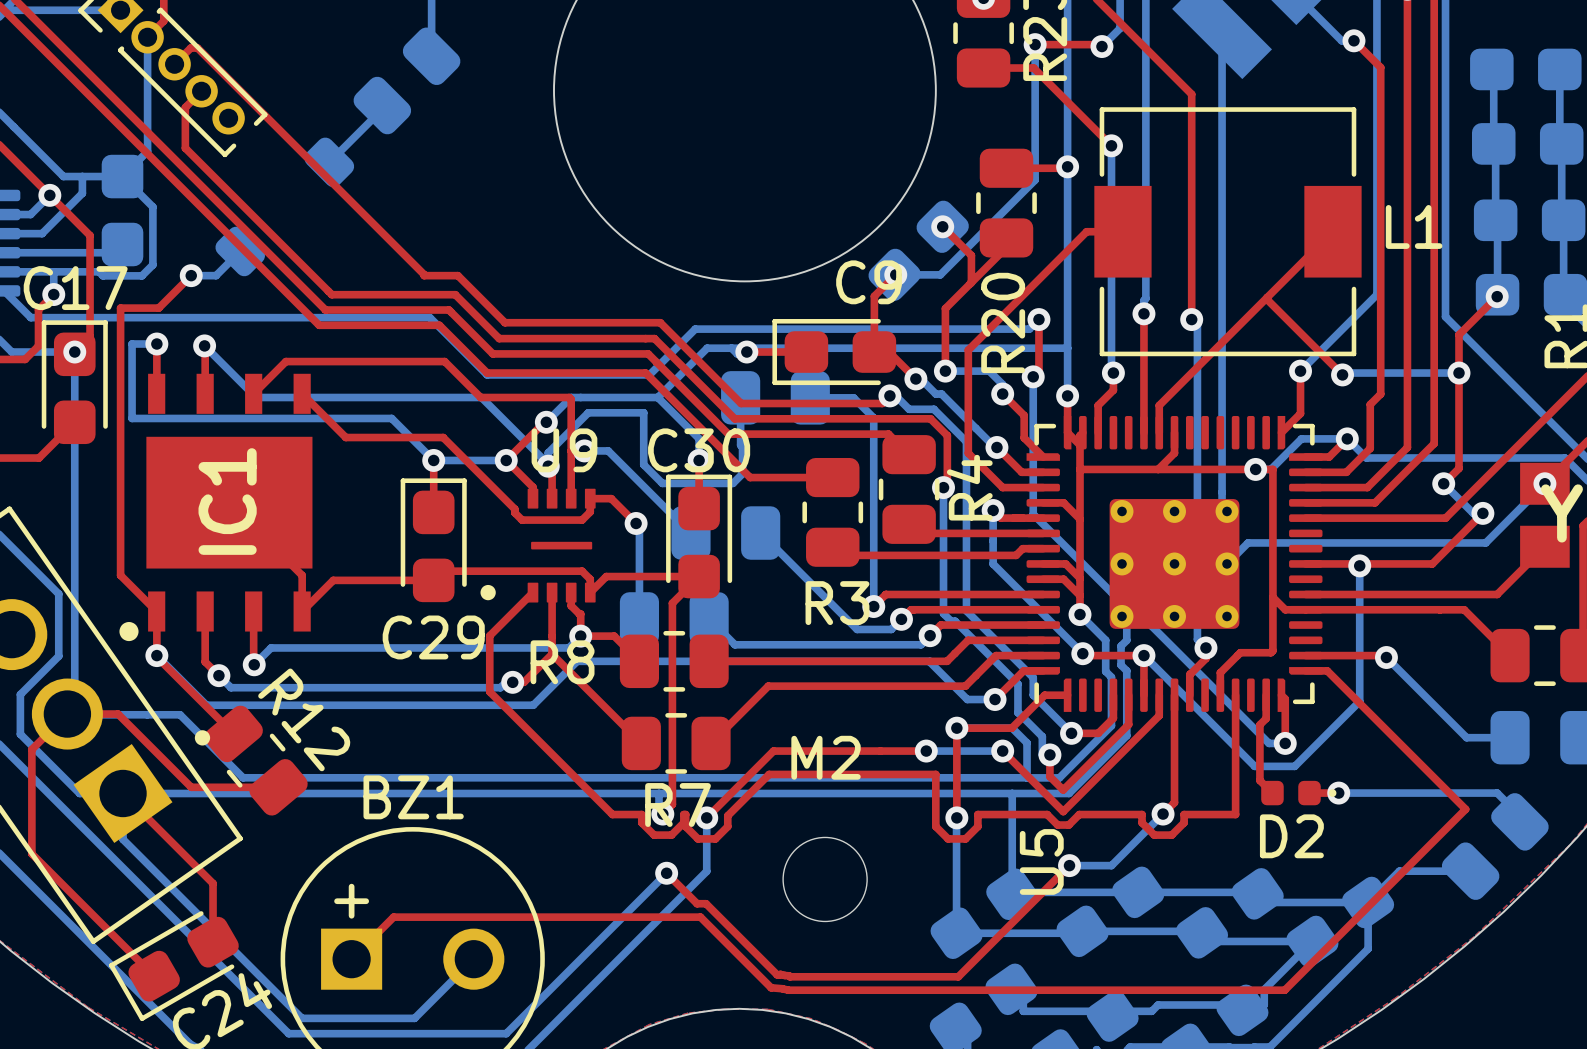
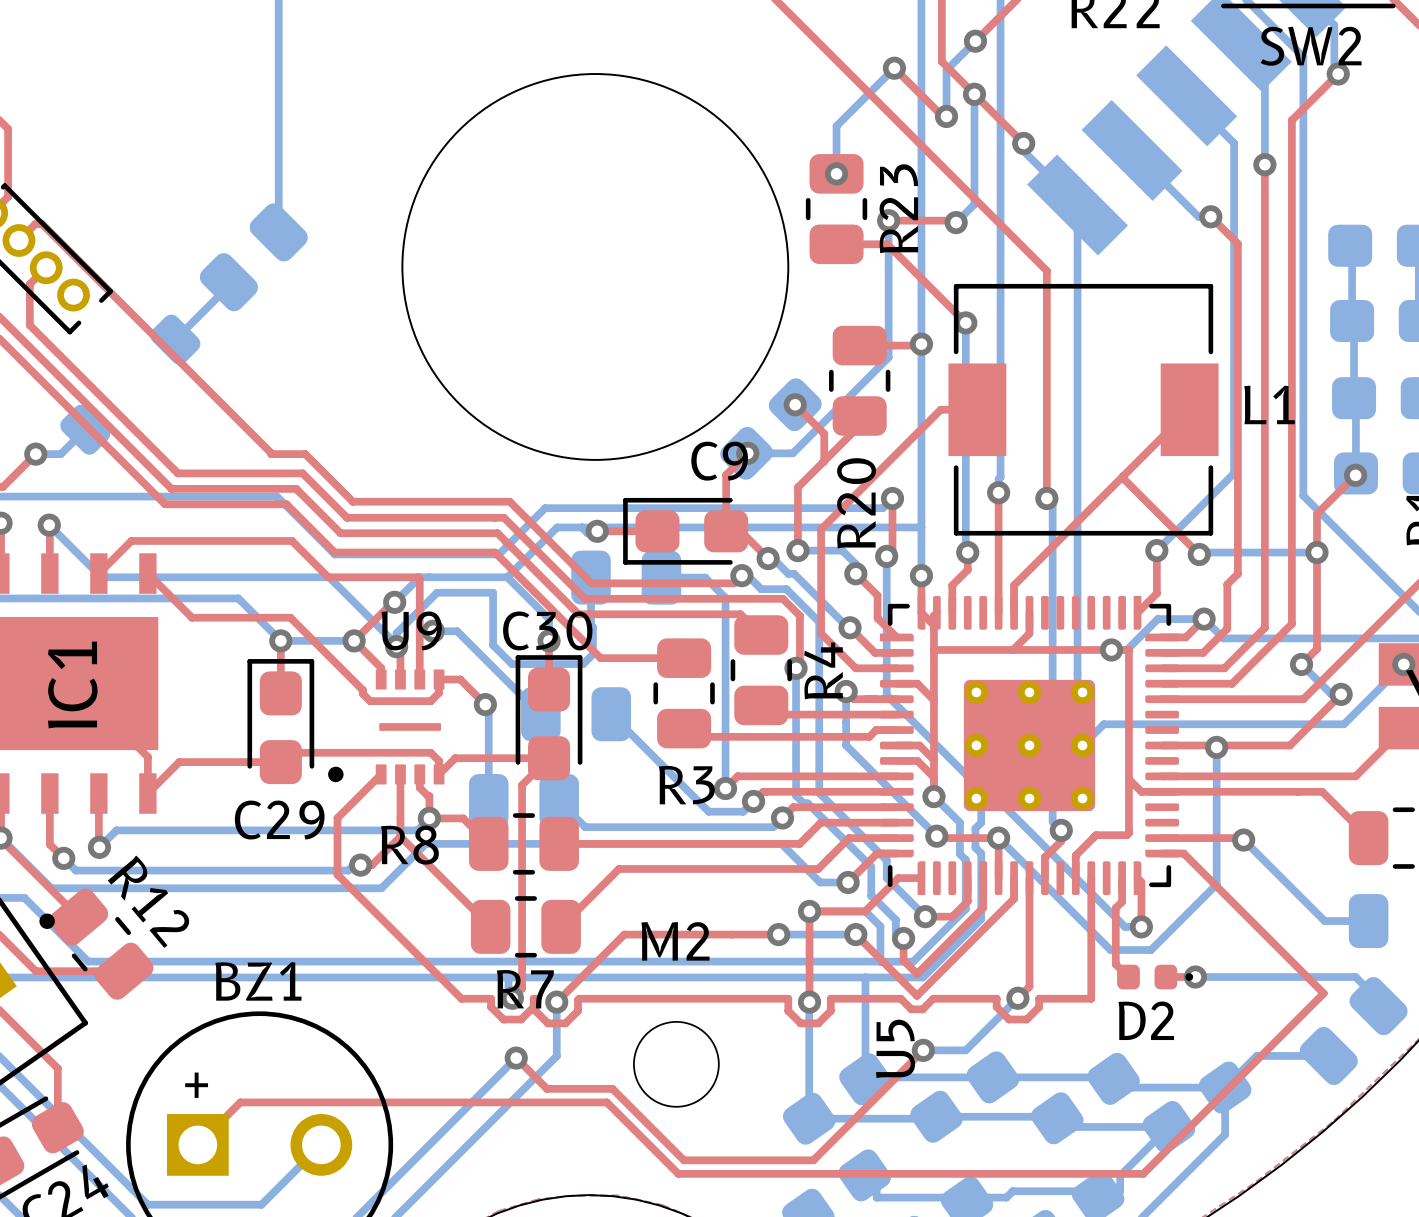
top track: (729, 814) (769, 774) (935, 774) (935, 814) -> (579, 998) (788, 998)
top track: (706, 903) (777, 974) (789, 976) (958, 976) (960, 974) -> (556, 1088) (612, 1088) (683, 1160) (813, 1160)
top track: (700, 917) (771, 987) (788, 990) (1284, 990) (1287, 987) -> (550, 1102) (606, 1102) (678, 1173) (1143, 1173)

